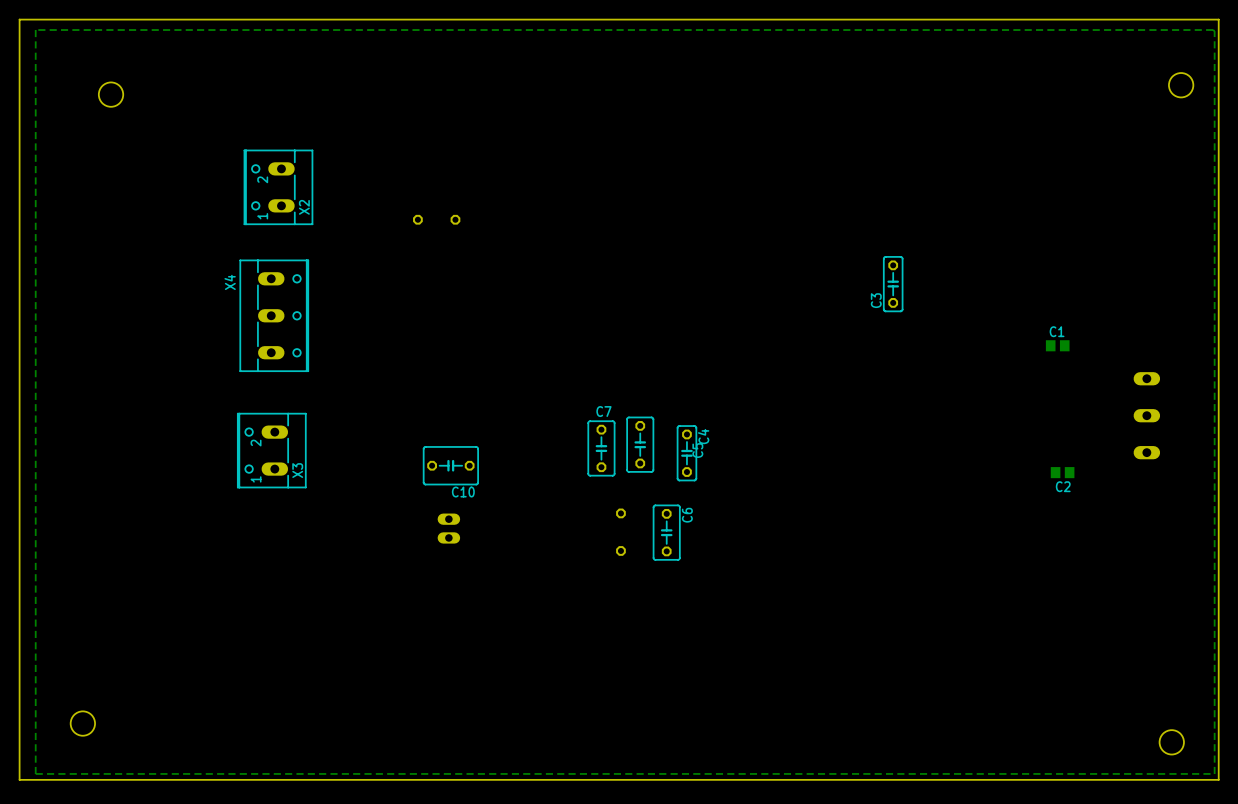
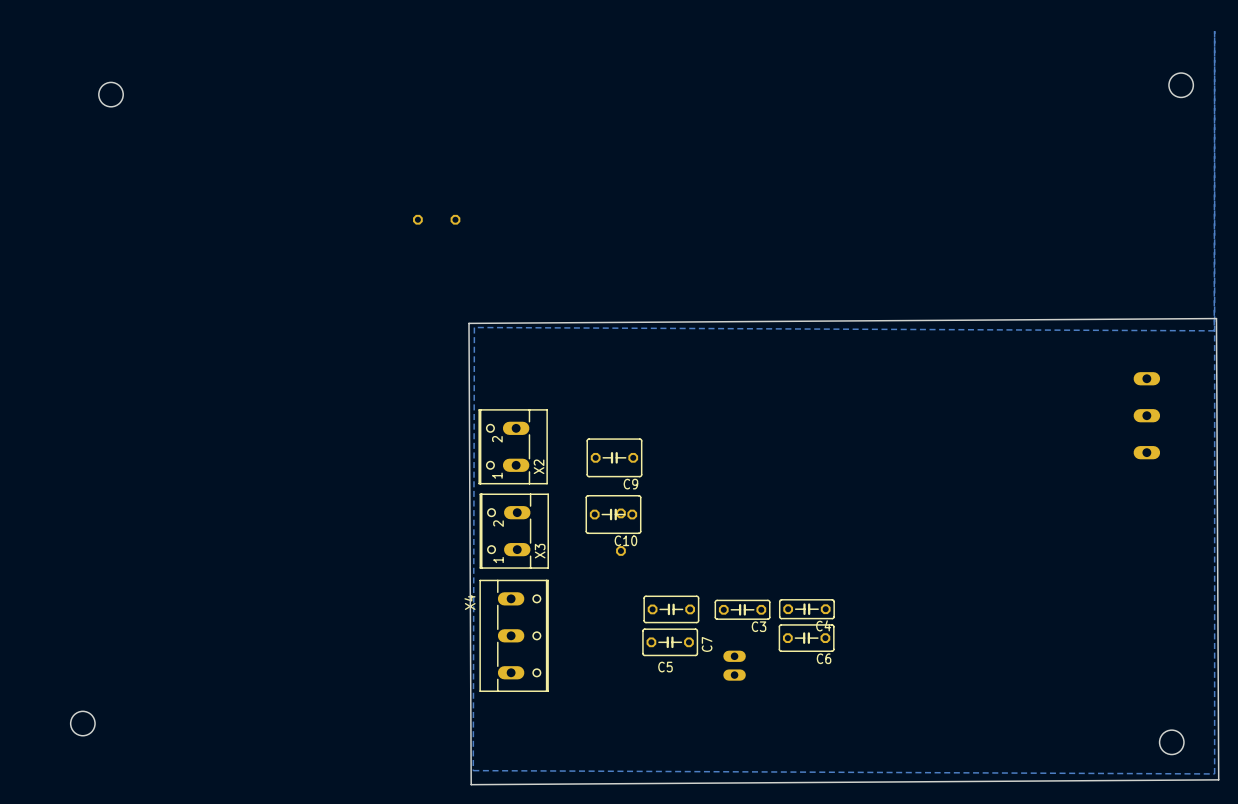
board edge: (1218, 19) (19, 19) (19, 779) (1218, 779) (1218, 19) -> none
zone outline: (1214, 31) (35, 30) (35, 773) (1214, 773) -> (1214, 31) (1214, 330) (474, 327) (473, 770) (1214, 773)
X2 position: (278, 187) -> (513, 446)
C3 rotation: 0° (893, 284) -> 90° counterclockwise (742, 609)
C3 position: (893, 284) -> (742, 609)
X4 position: (274, 315) -> (514, 635)
board edge: none -> (1216, 318) (468, 323) (471, 784) (1218, 779) (1216, 318)
C1: (1057, 345) -> none
C5 rotation: 0° (640, 444) -> 90° clockwise (671, 609)
C5 position: (640, 444) -> (671, 609)
C7 rotation: 0° (601, 448) -> 90° clockwise (670, 642)
C7 position: (601, 448) -> (670, 642)
X3 position: (271, 450) -> (514, 531)
C4 rotation: 0° (686, 453) -> 90° clockwise (806, 609)
C4 position: (686, 453) -> (806, 609)
C9: none -> (614, 457)
C10 position: (450, 465) -> (613, 514)
C2: (1062, 472) -> none
part: (448, 528) -> none
C6 rotation: 0° (666, 532) -> 90° clockwise (806, 638)
C6 position: (666, 532) -> (806, 638)
part: none -> (734, 665)

